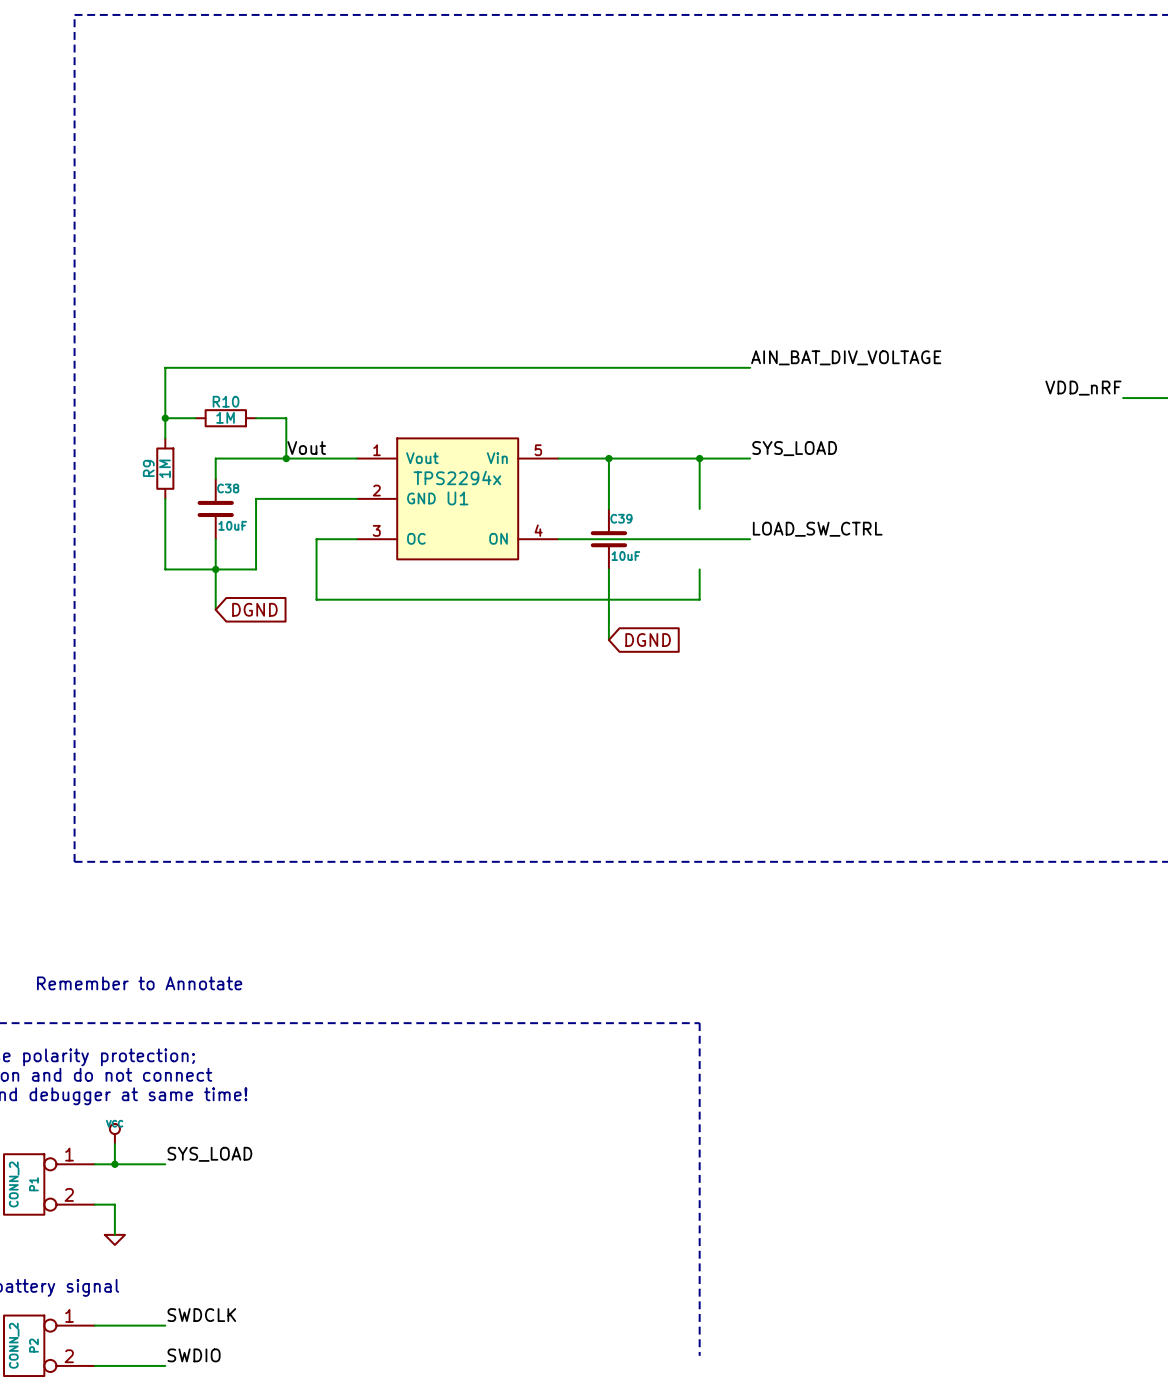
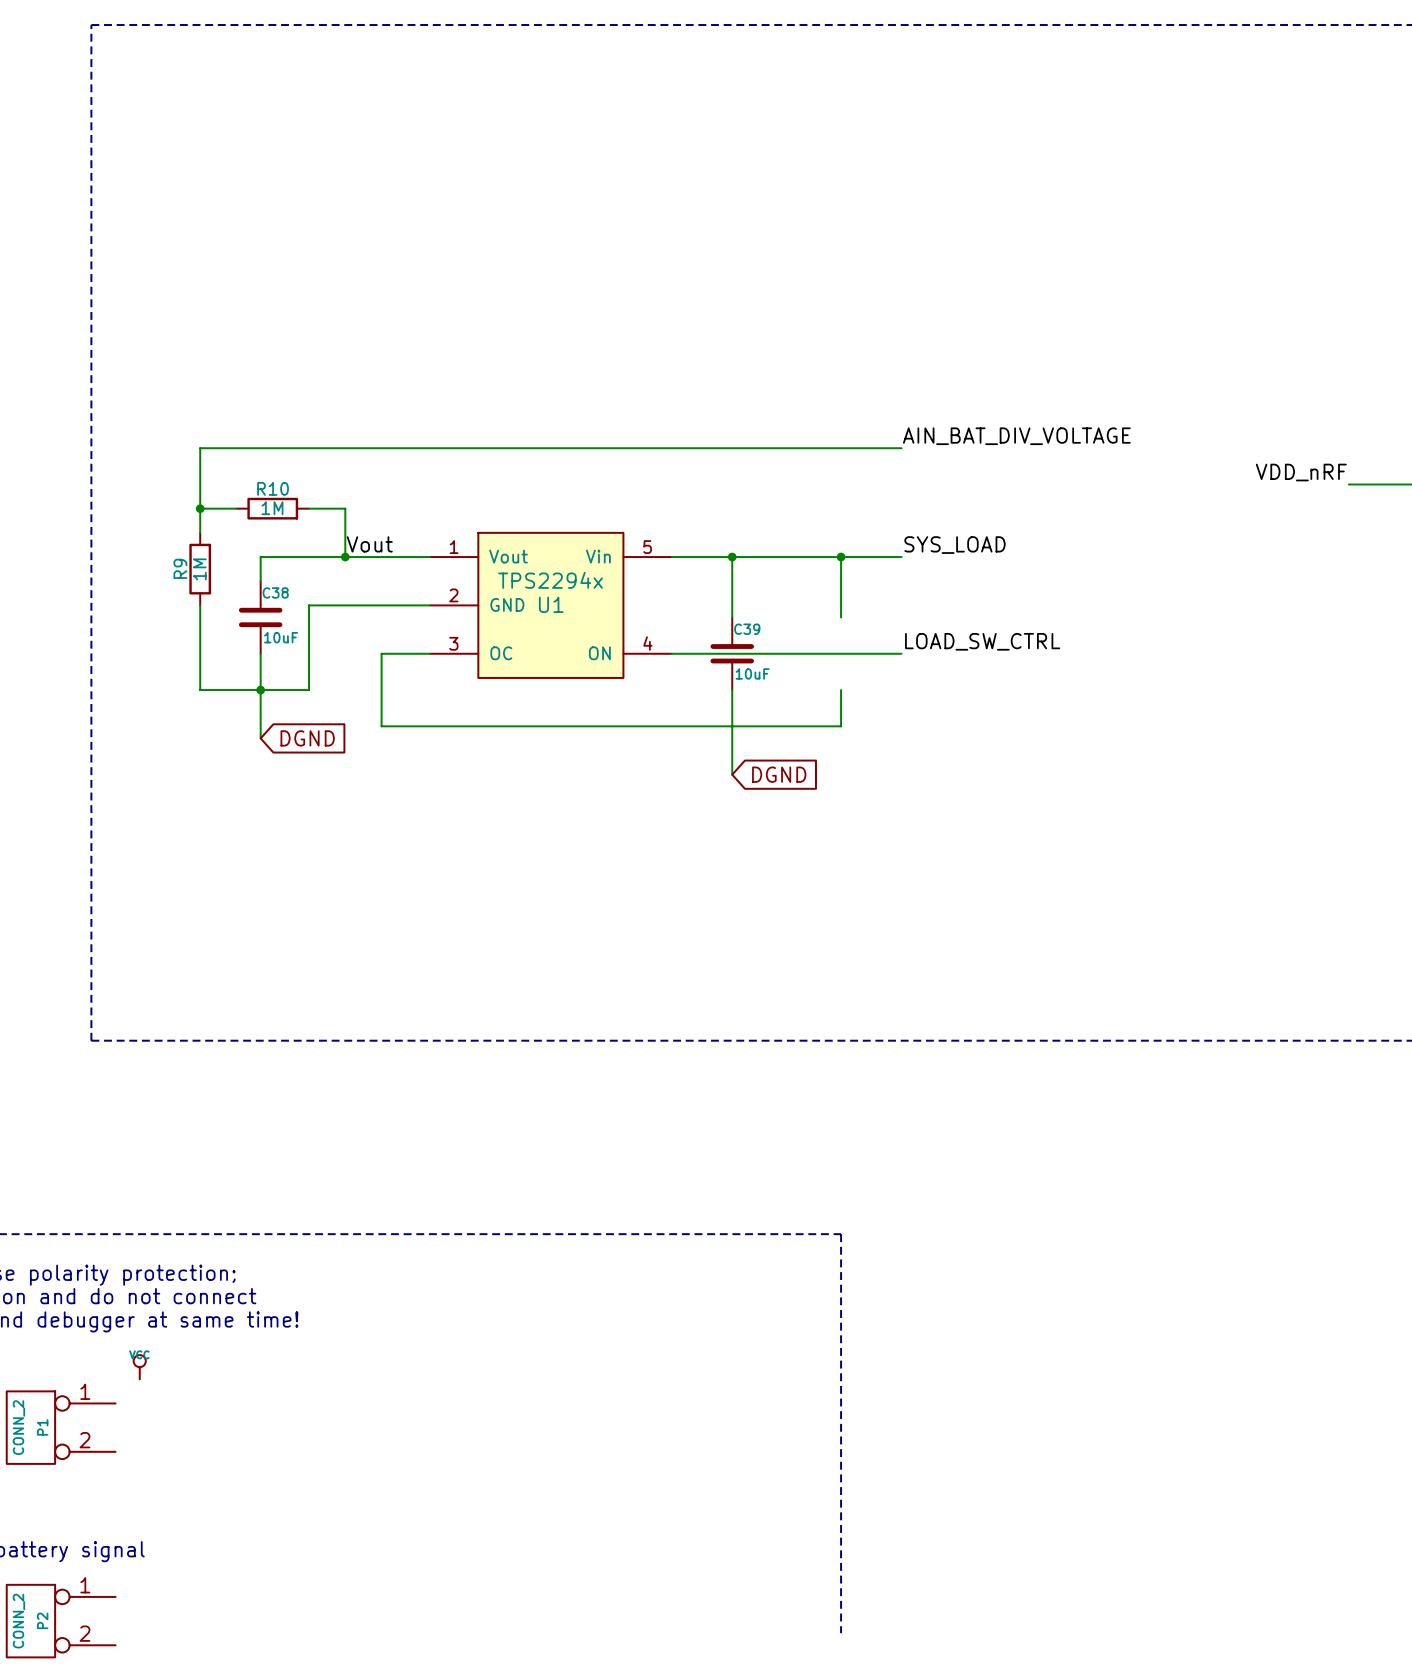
text: Remember to Annotate (139, 983) -> none
wire: (114, 1144) (114, 1164) -> none
label: SYS_LOAD (209, 1154) -> none
wire: (94, 1164) (165, 1164) -> none
junction: (114, 1164) -> none
wire: (94, 1204) (114, 1204) (114, 1234) -> none
power symbol: (114, 1239) -> none
label: SWDCLK (201, 1315) -> none
wire: (94, 1325) (165, 1325) -> none
label: SWDIO (194, 1355) -> none
wire: (94, 1365) (165, 1365) -> none

